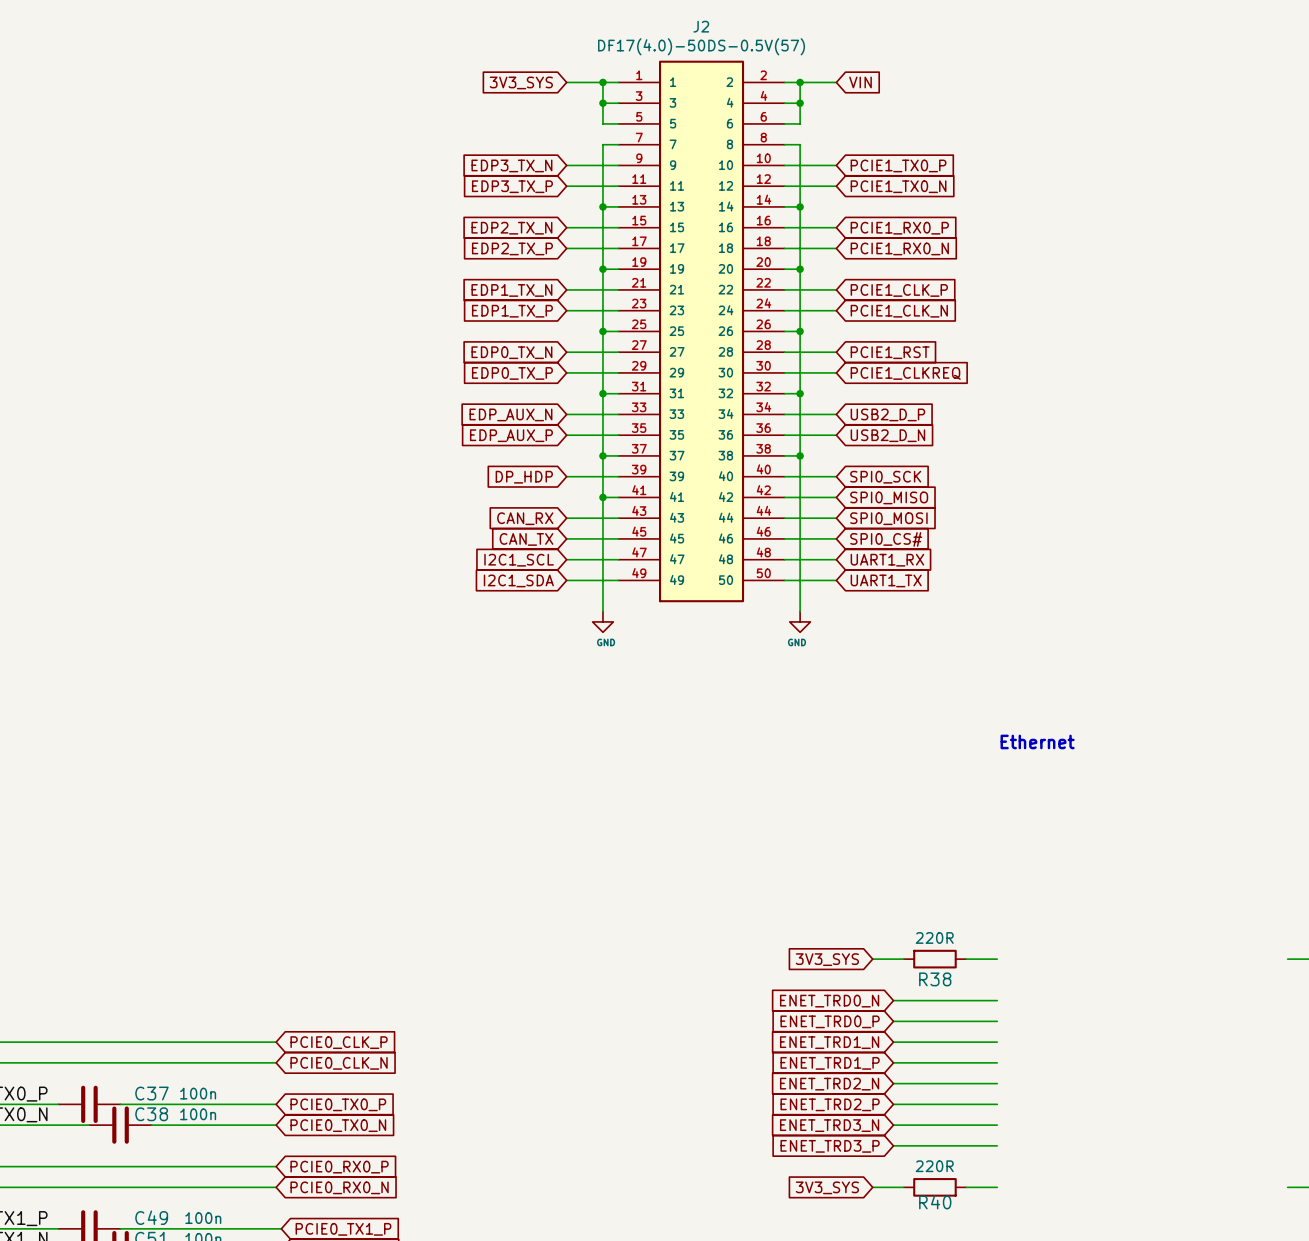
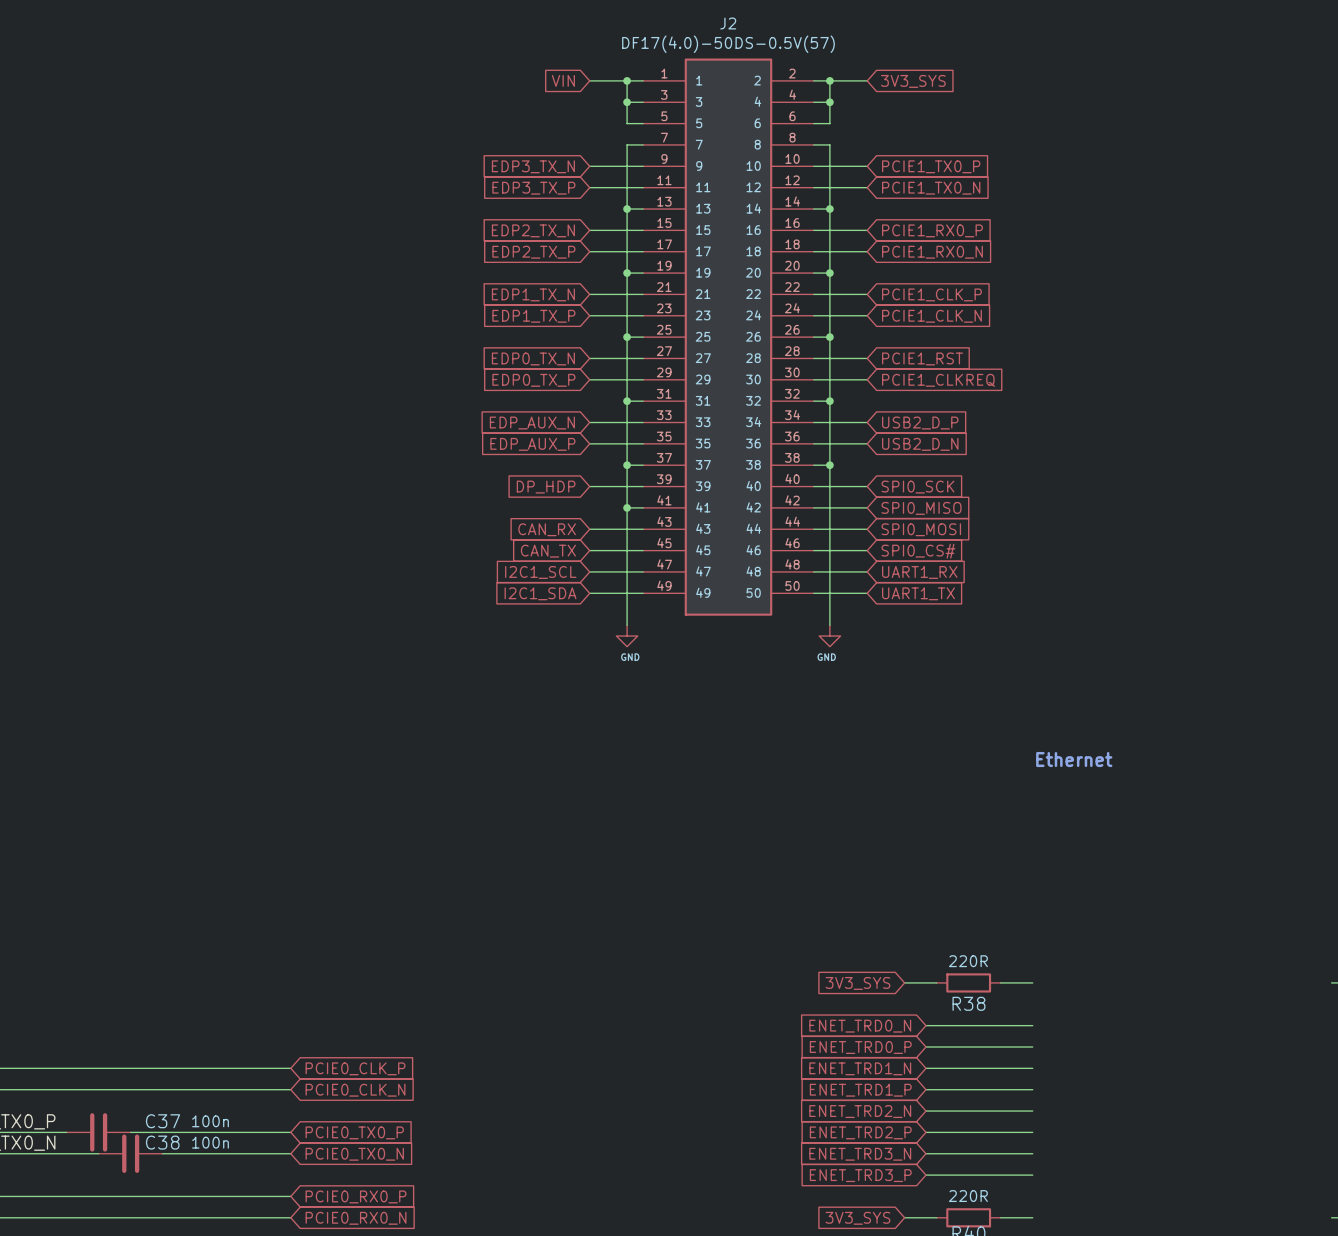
global label: 3V3_SYS (521, 82) -> VIN (563, 80)
global label: VIN (860, 82) -> 3V3_SYS (913, 81)

